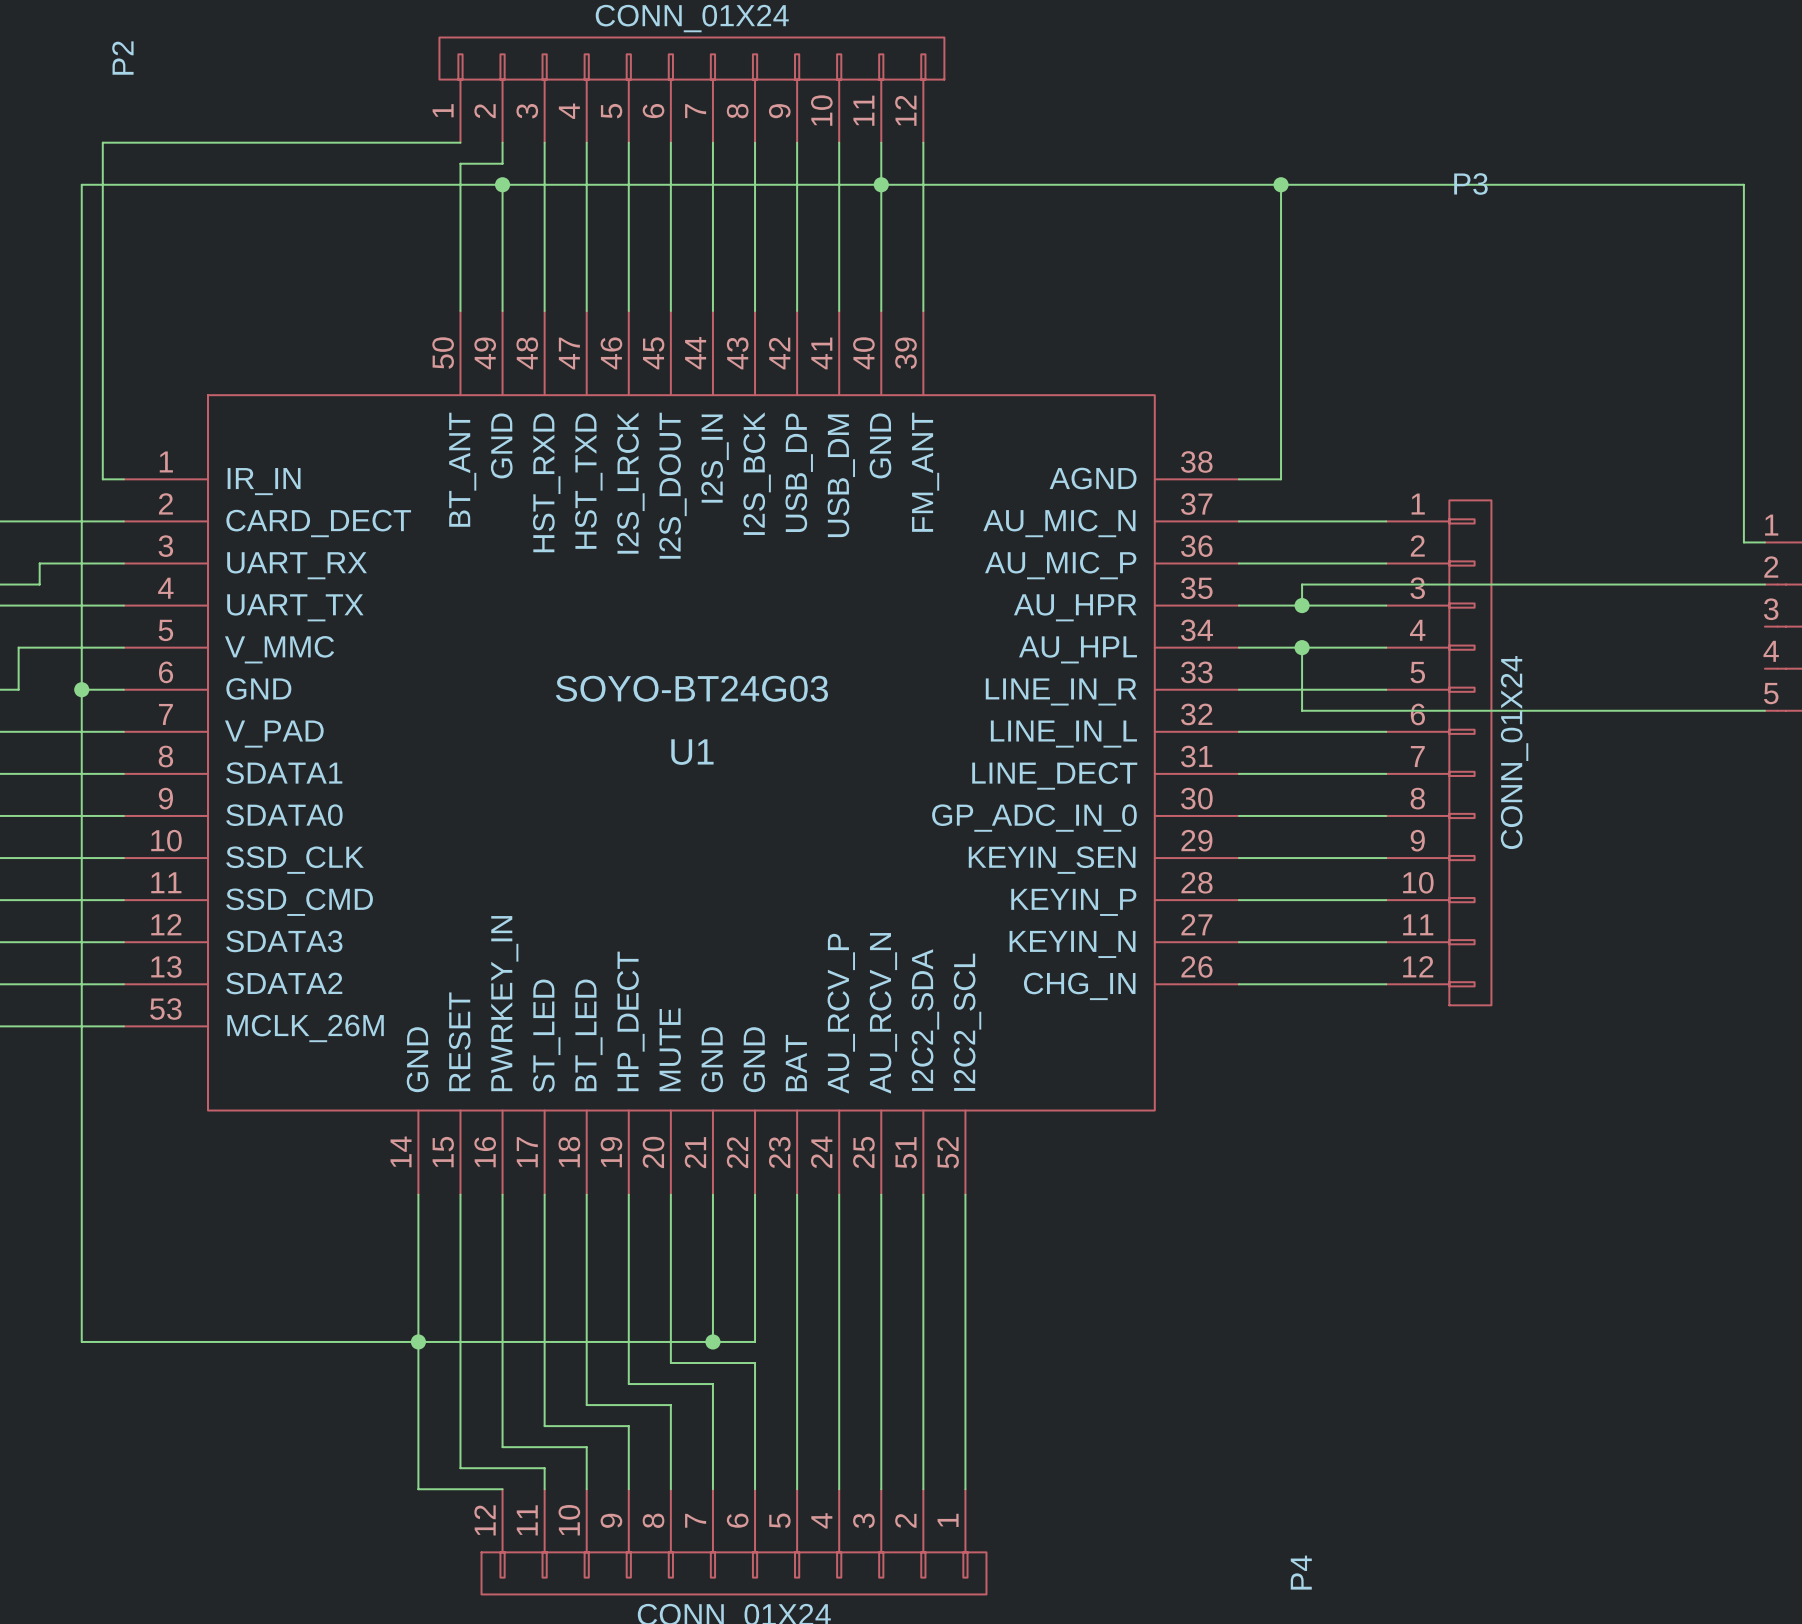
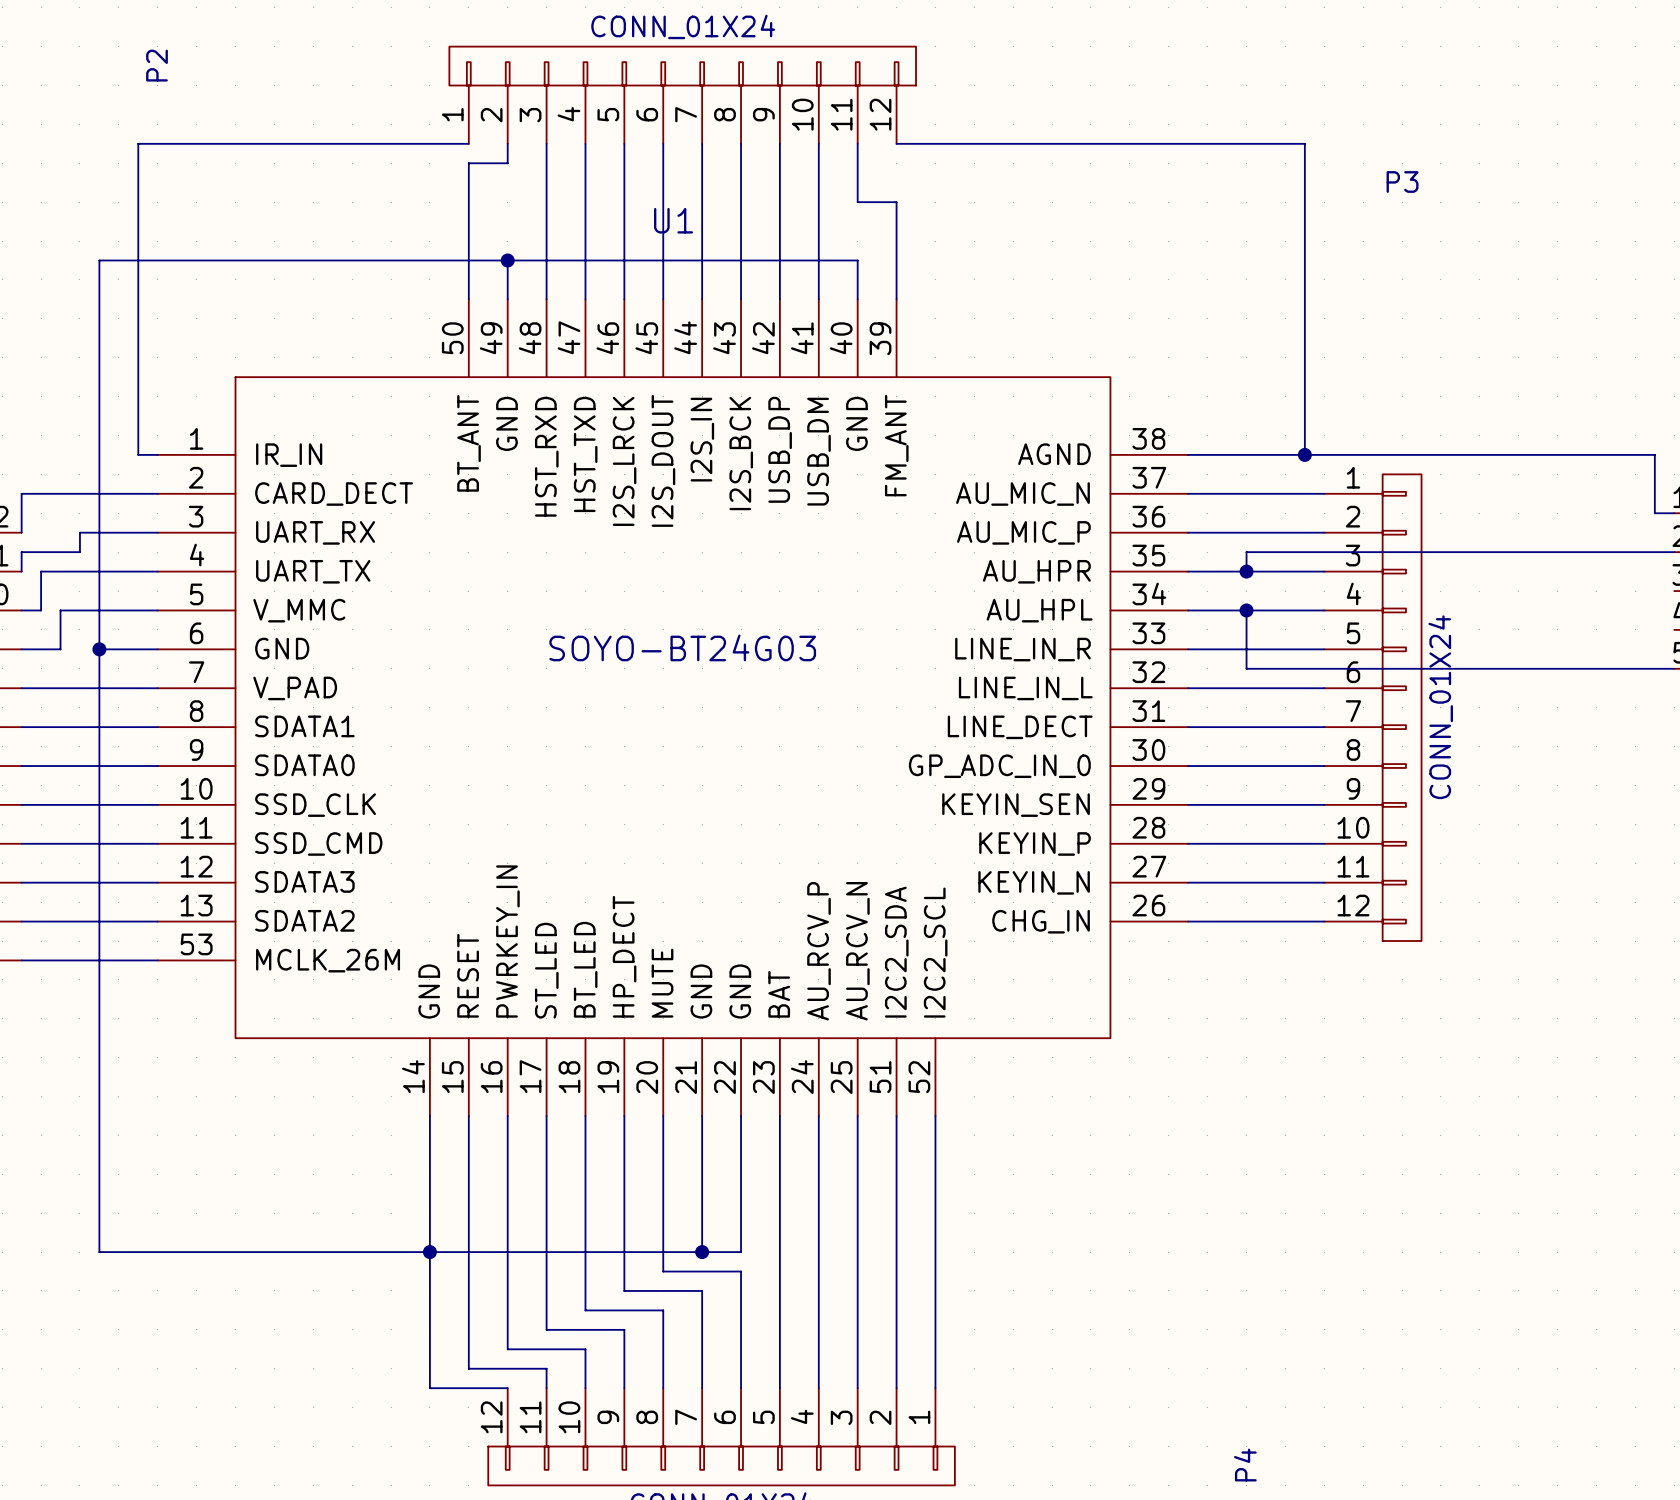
wire: (923, 142) (923, 205) -> (896, 143) (1304, 143) (1304, 454)
wire: (502, 184) (502, 268) -> none
junction position: (502, 184) -> (507, 260)
junction: (881, 184) -> none
wire: (1281, 184) (1281, 479) -> (1654, 454) (1227, 454)
junction: (1281, 184) -> none
wire: (881, 205) (881, 268) -> (857, 202) (896, 202)
junction: none -> (1304, 454)
wire: (1743, 479) (1743, 184) (81, 184) (81, 1341) -> (857, 260) (99, 260) (99, 1252) (118, 1252)
wire: none -> (99, 649) (118, 649)
junction position: (81, 689) -> (99, 649)
U1 name position: U1 (692, 752) -> U1 (673, 220)

